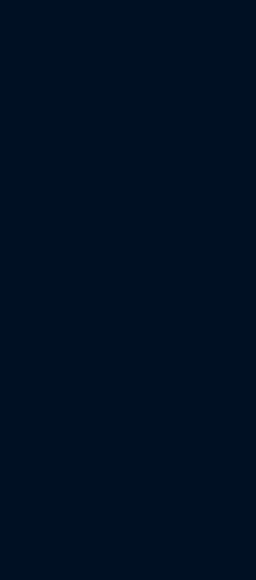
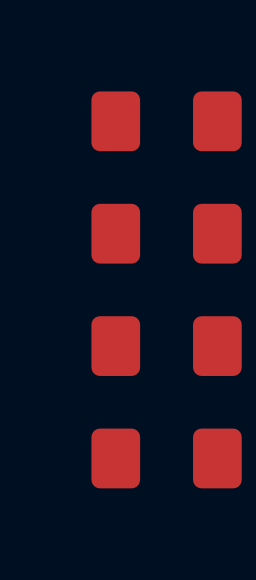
part: none -> (166, 121)
part: none -> (166, 233)
part: none -> (166, 346)
part: none -> (166, 458)

